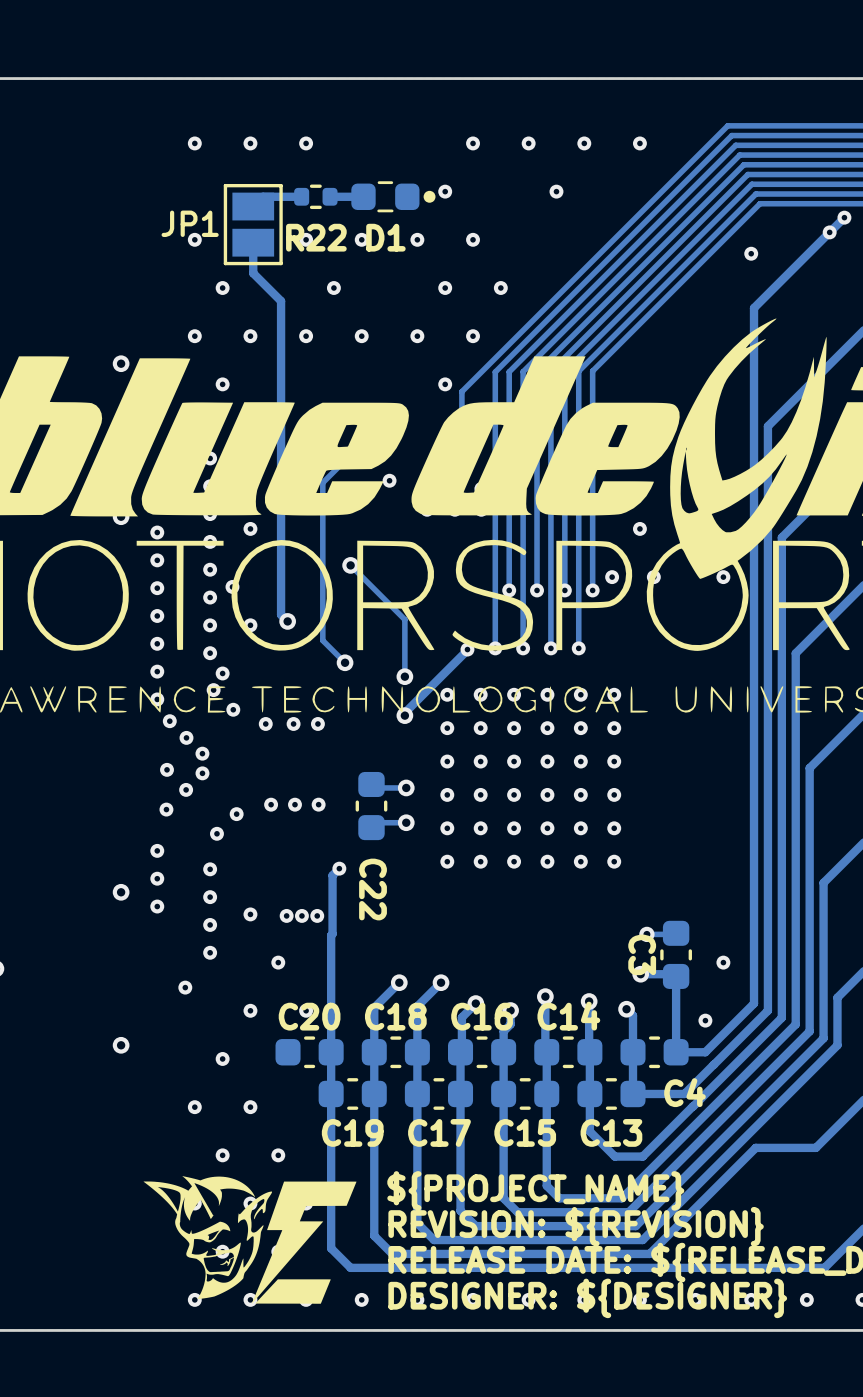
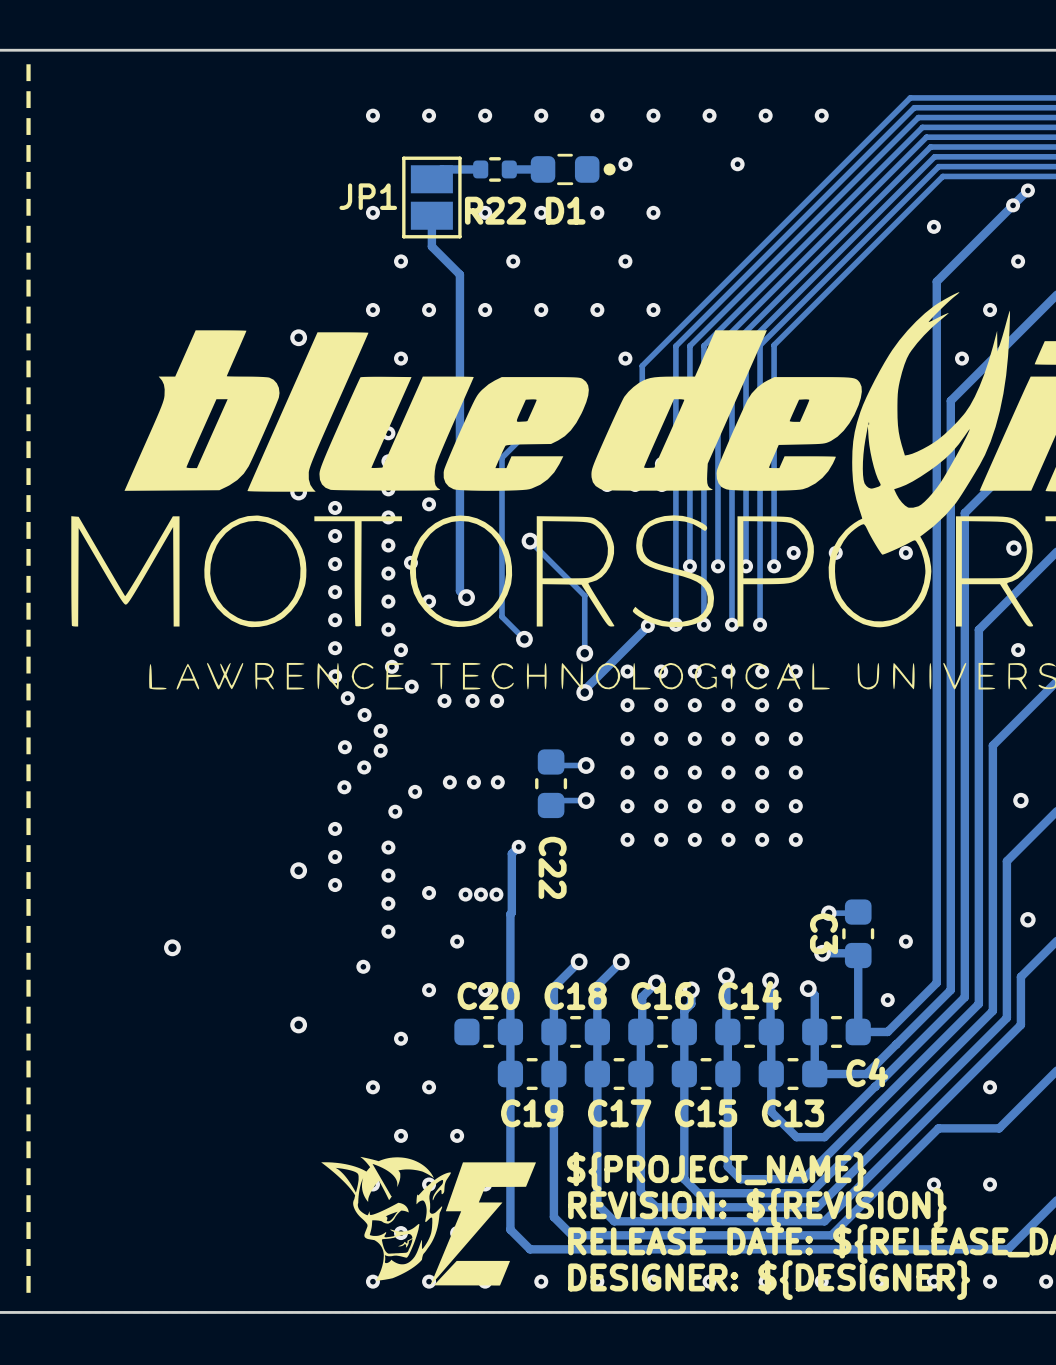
via: none -> (541, 115)
via: none -> (597, 115)
via: (500, 288) -> none
via: none -> (1018, 261)
via: none -> (990, 310)
via: none -> (962, 358)
via: (389, 480) -> none
via: (639, 528) -> none
via: none -> (1013, 548)
via: none -> (1018, 650)
via: none -> (1020, 800)
via: none -> (1027, 919)
via: none -> (990, 1087)
via: none -> (933, 1184)
via: none -> (990, 1184)

